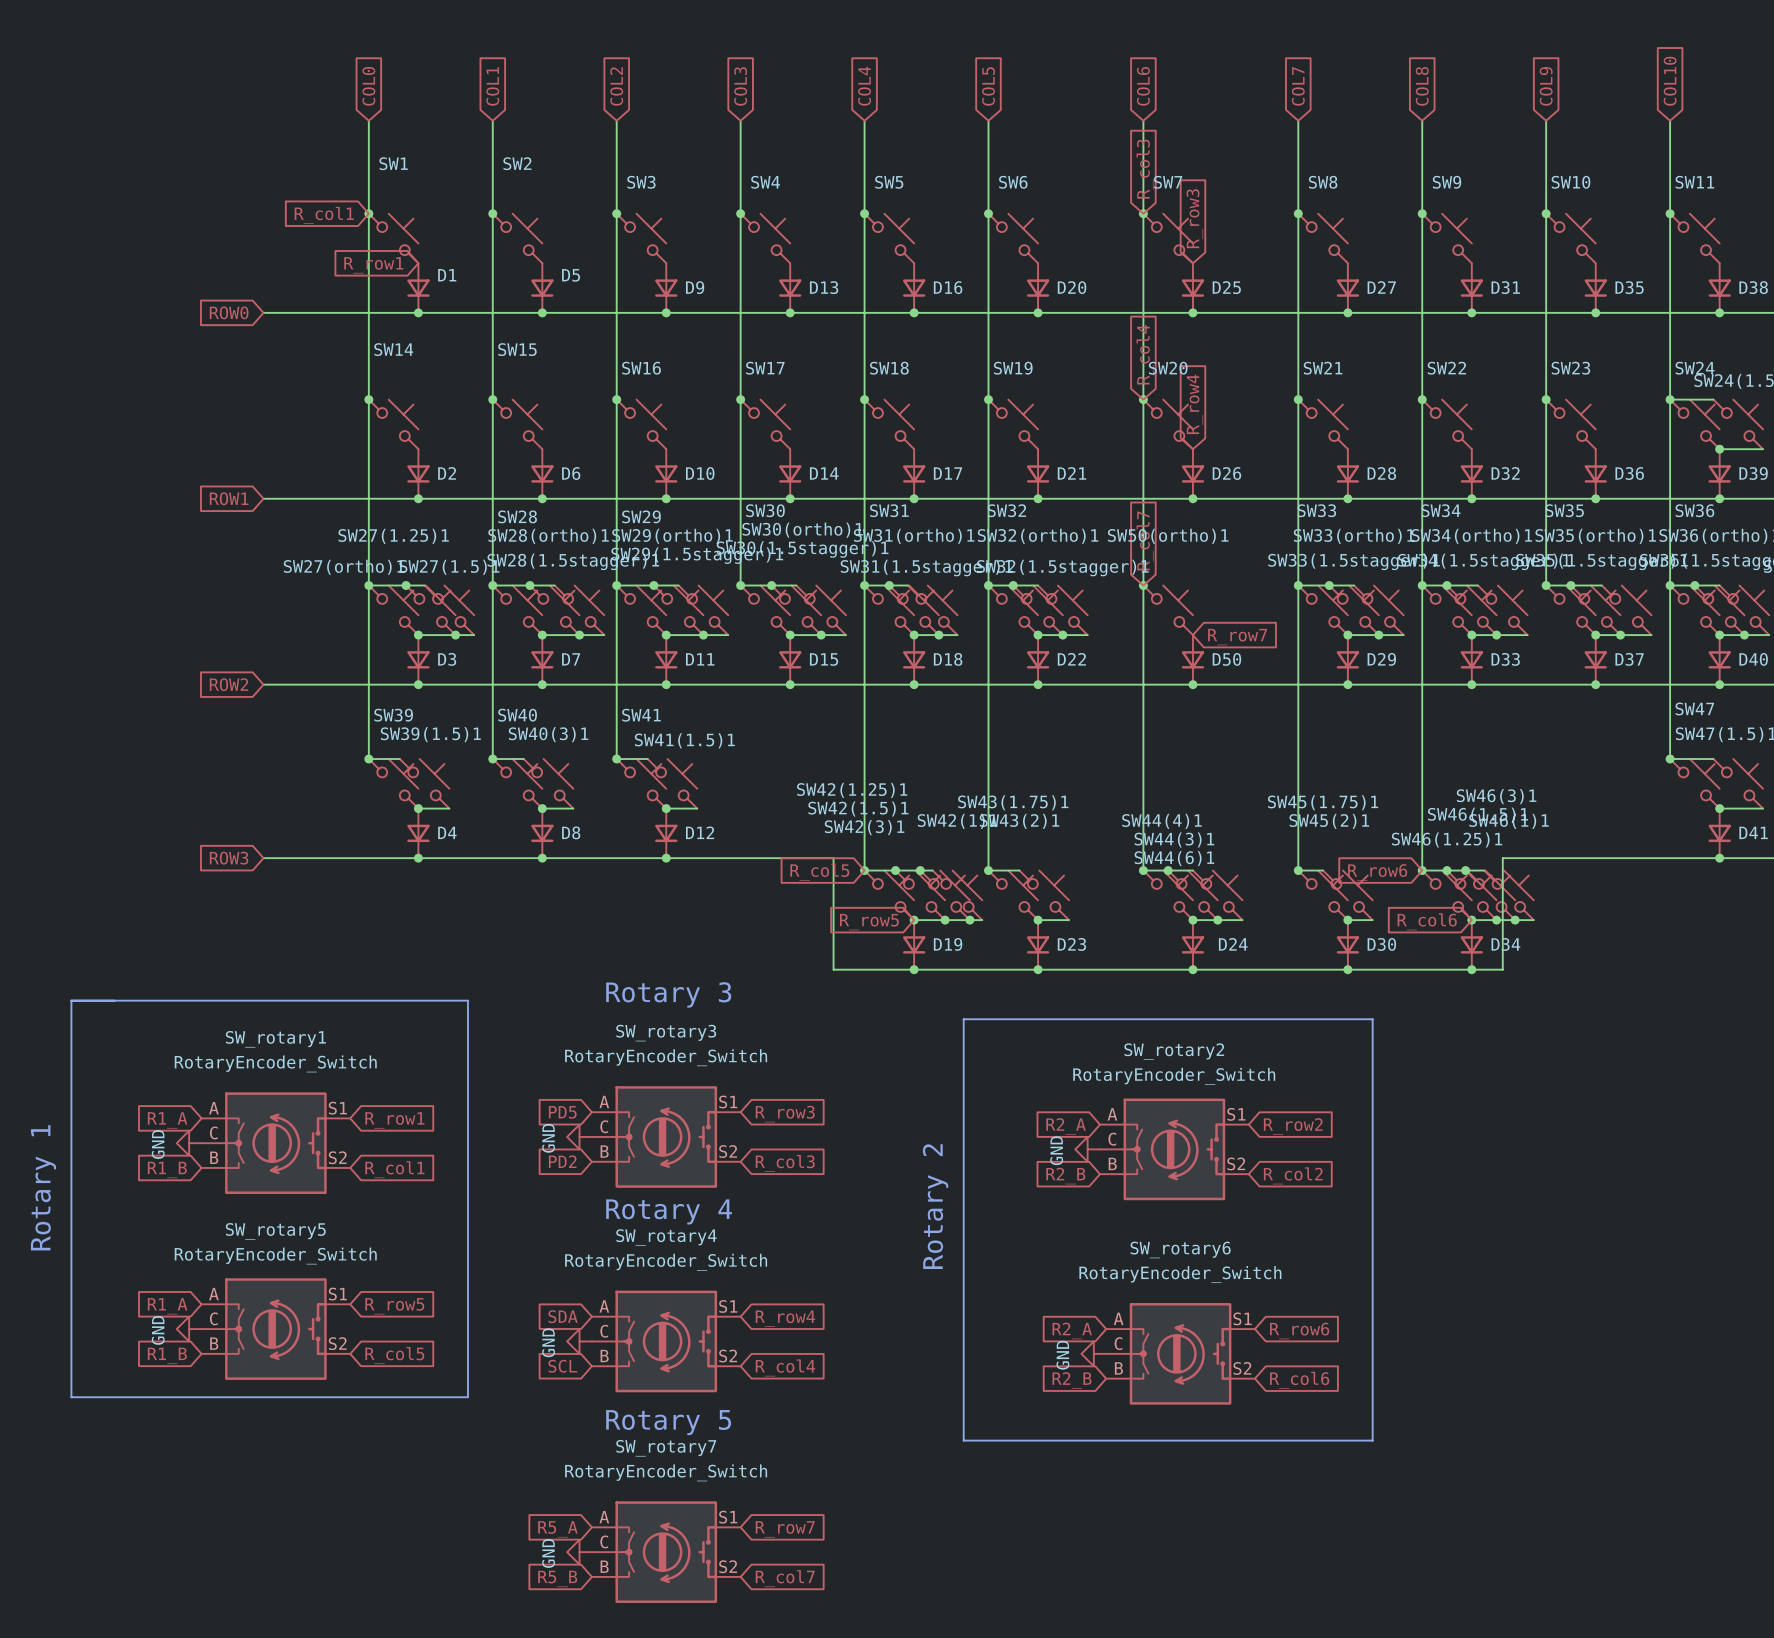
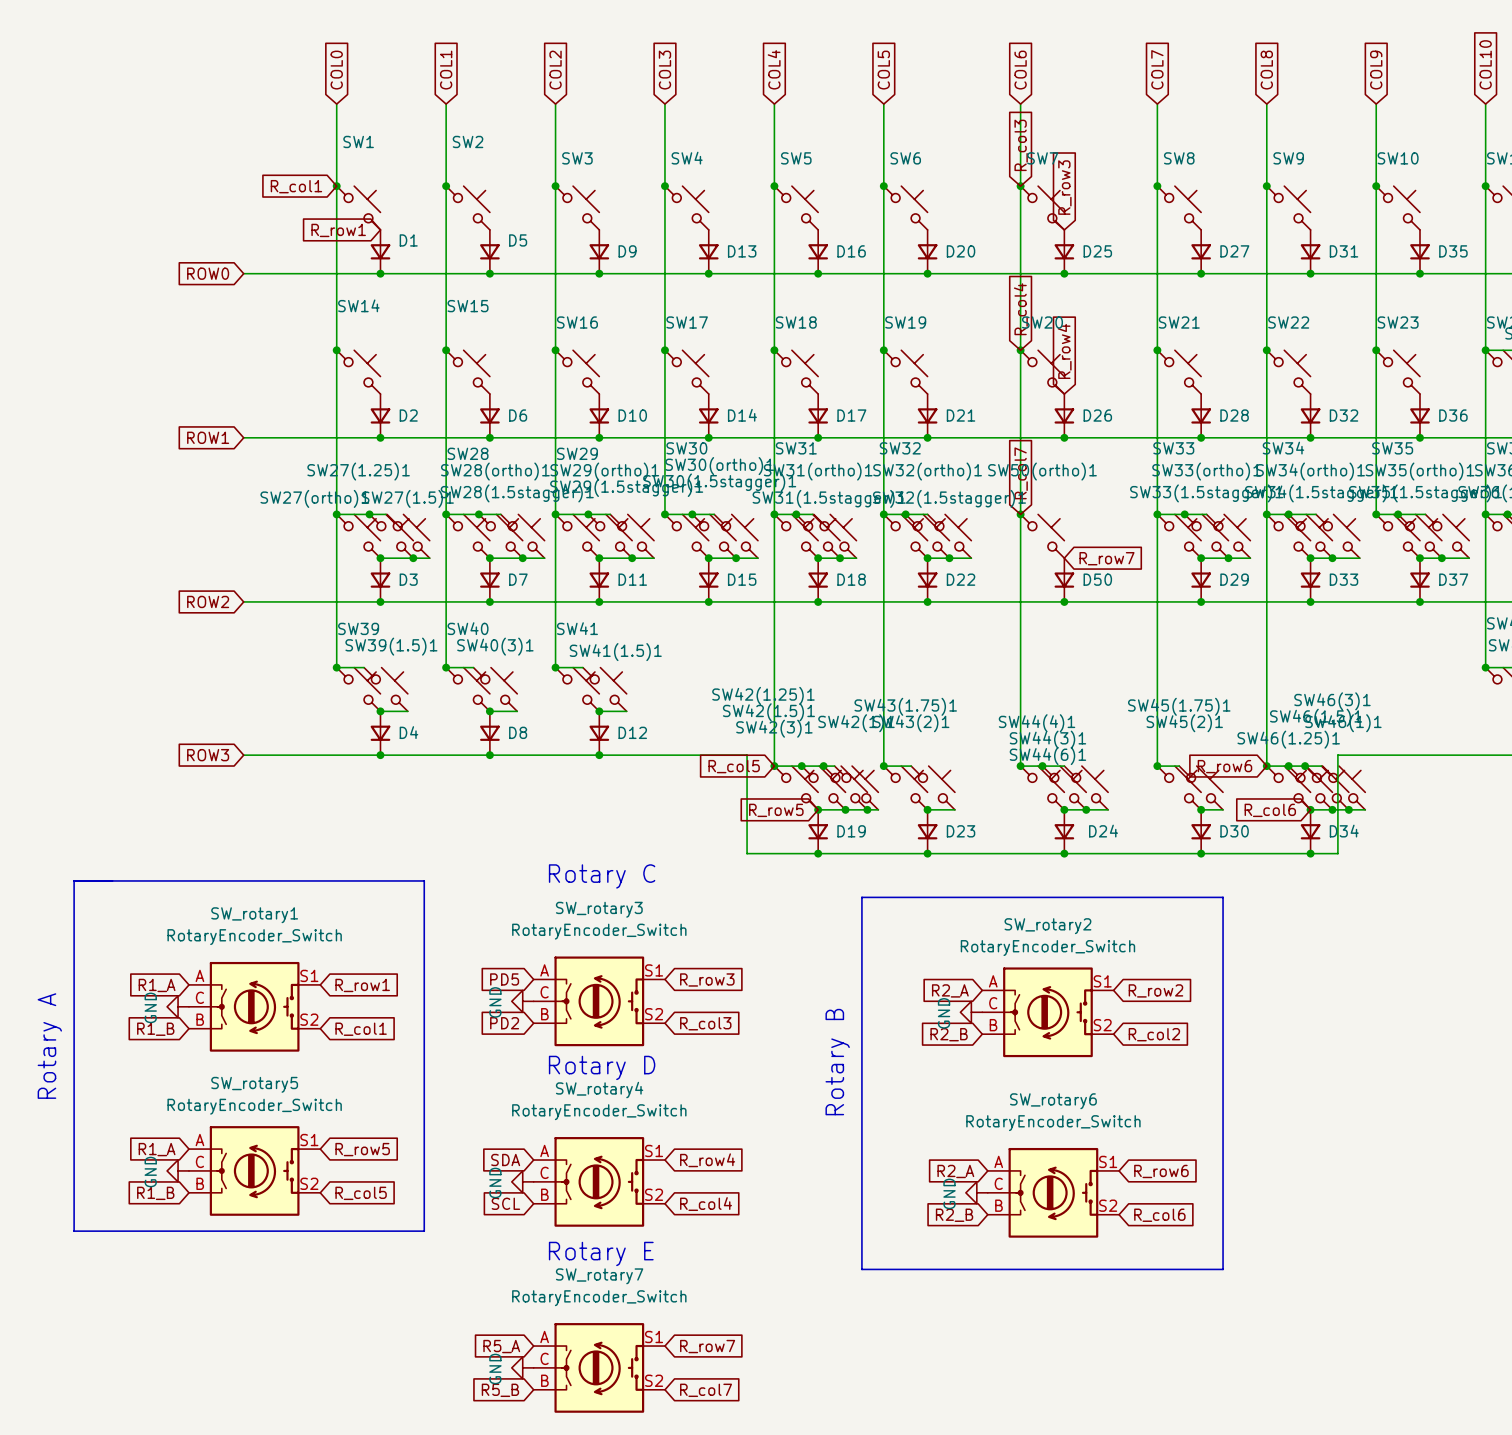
text: Rotary 3 (668, 994) -> Rotary C (602, 876)
text: Rotary 1 (43, 1187) -> Rotary A (49, 1046)
text: Rotary 2 (935, 1206) -> Rotary B (837, 1062)
text: Rotary 4 (669, 1211) -> Rotary D (602, 1067)
text: Rotary 5 (668, 1422) -> Rotary E (601, 1253)

